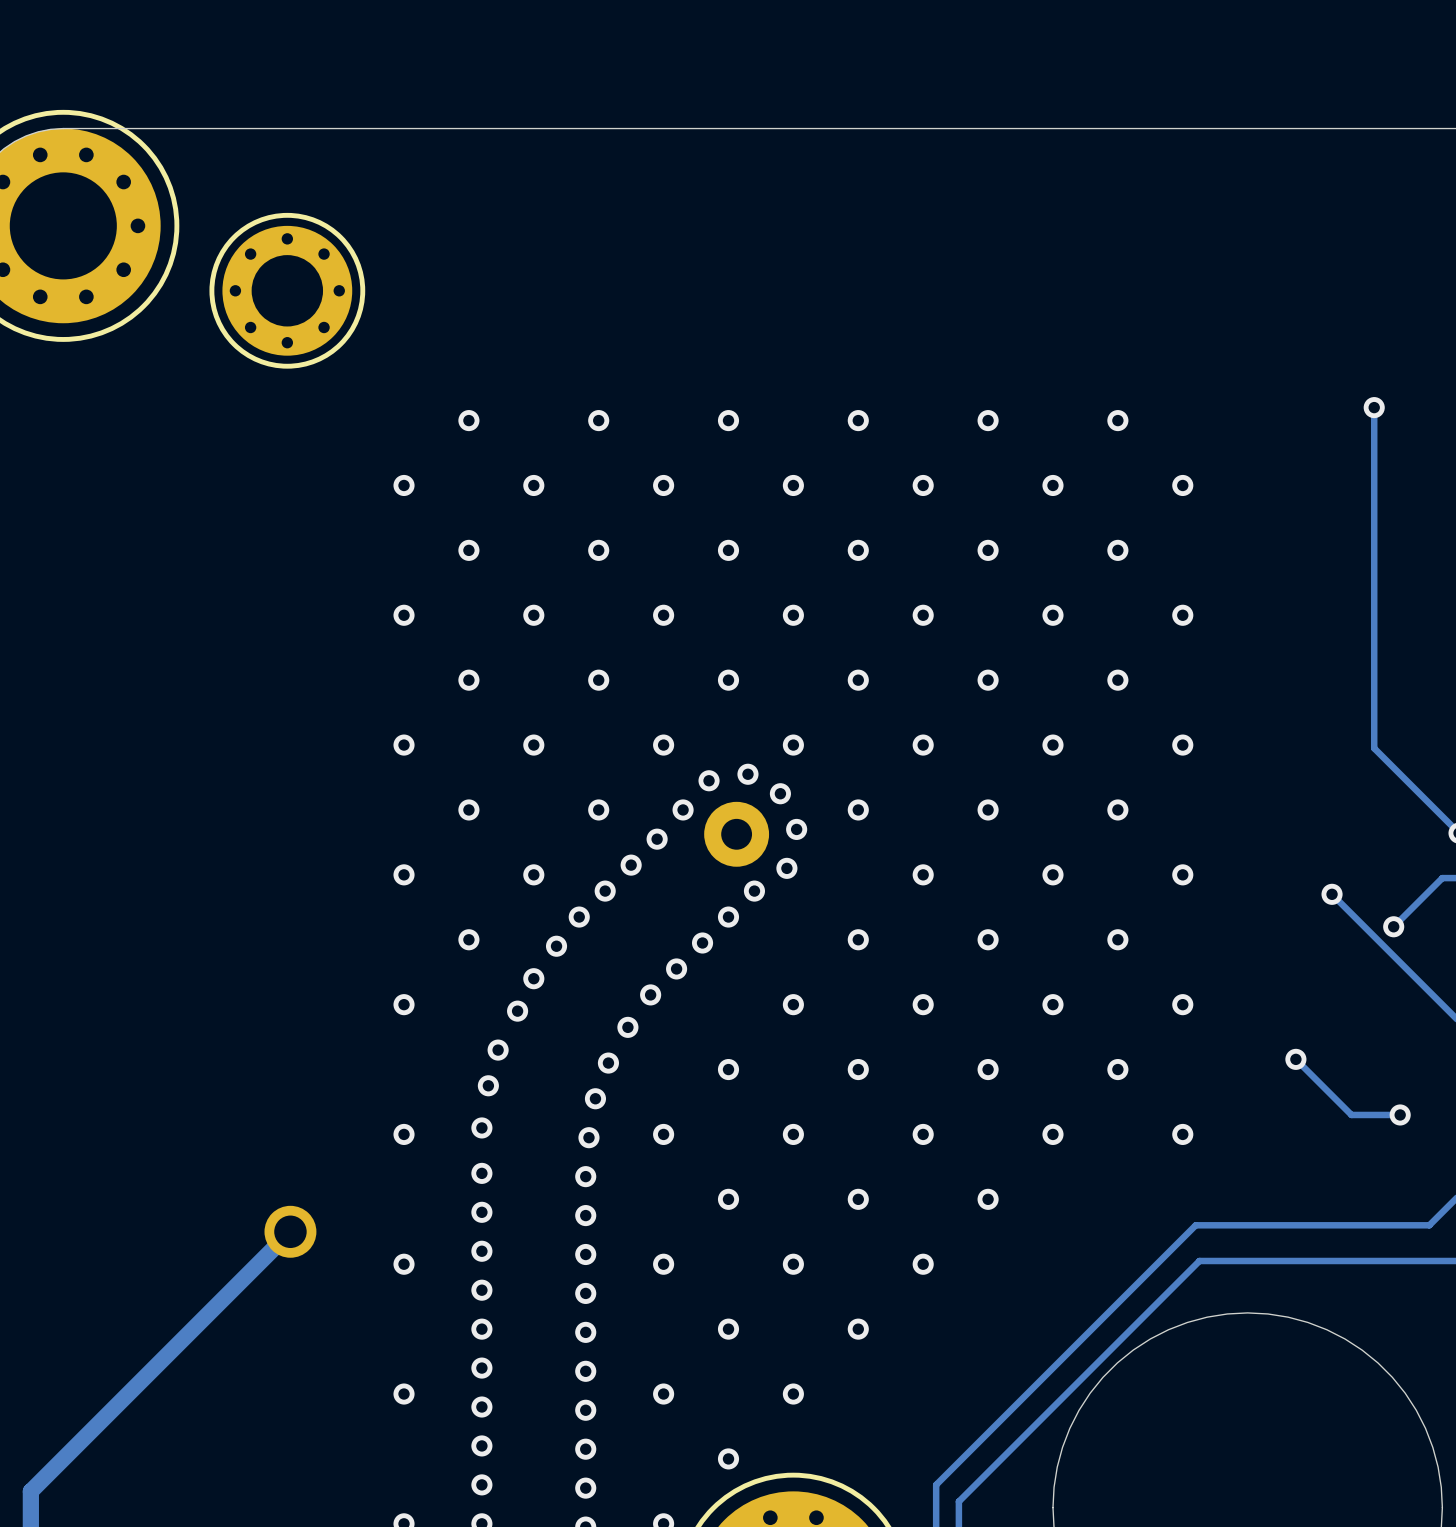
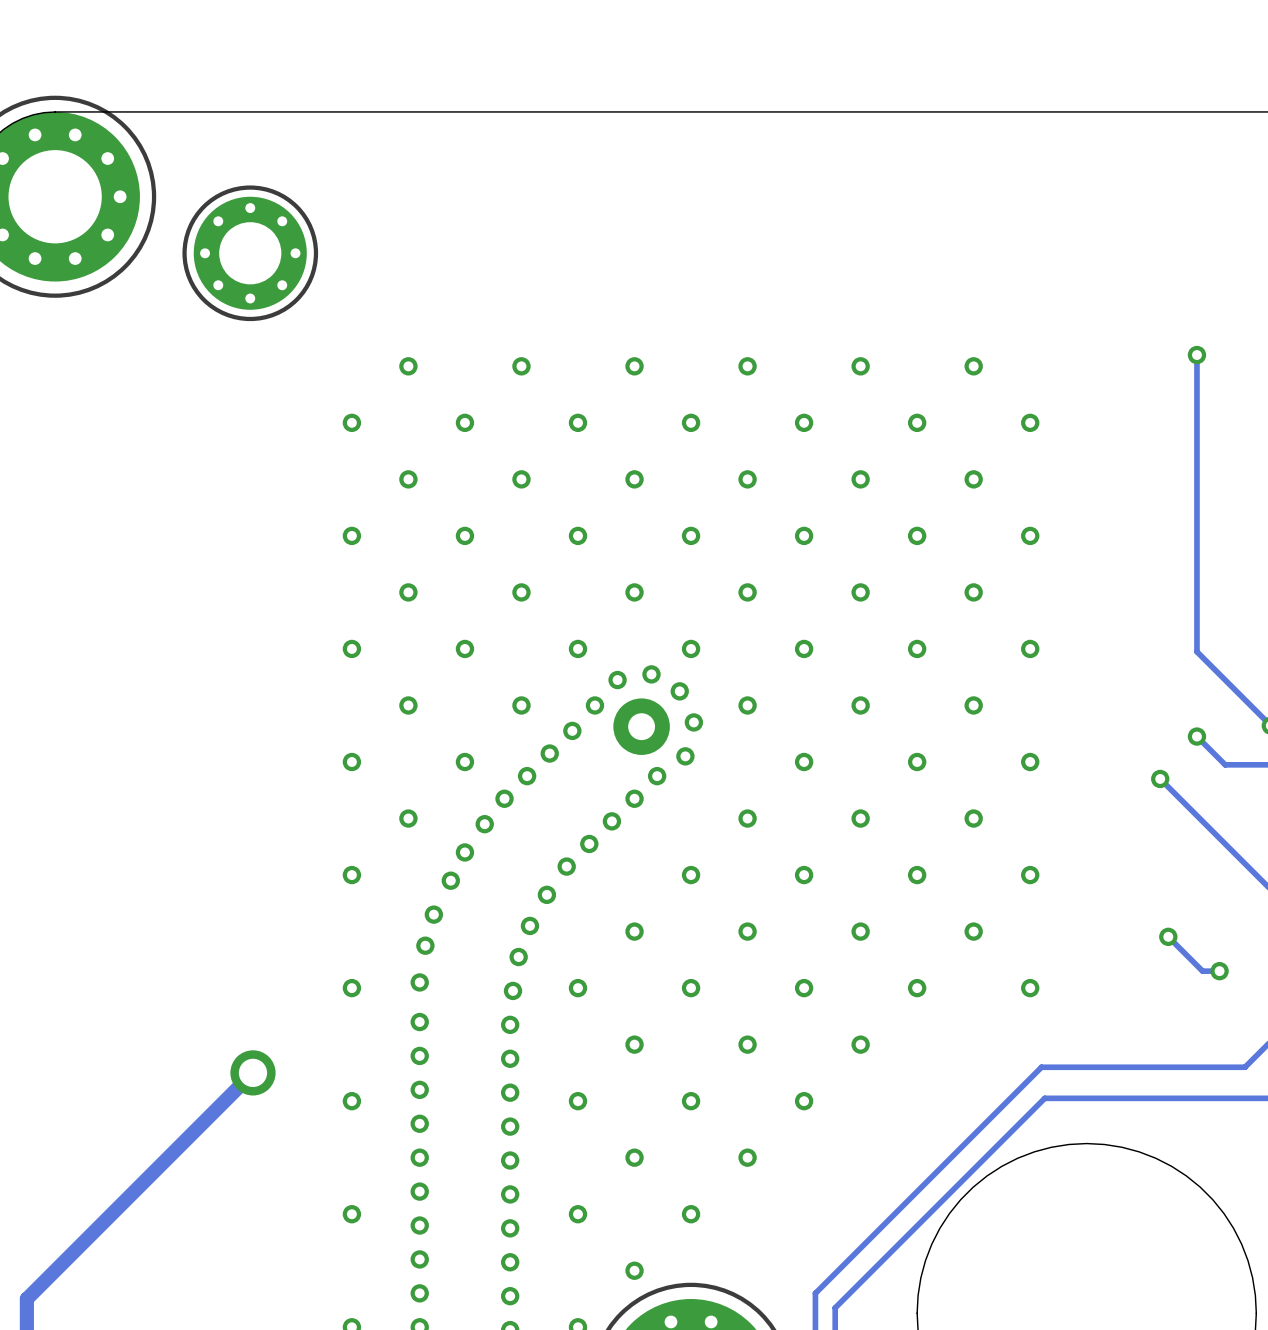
via: none -> (1196, 736)
track: (1442, 878) (1393, 926) -> (1256, 764) (1225, 764) (1196, 736)
via: (1393, 926) -> none
track: (1295, 1059) (1351, 1114) (1380, 1114) -> (1168, 936) (1202, 971)
via position: (1295, 1059) -> (1168, 936)

